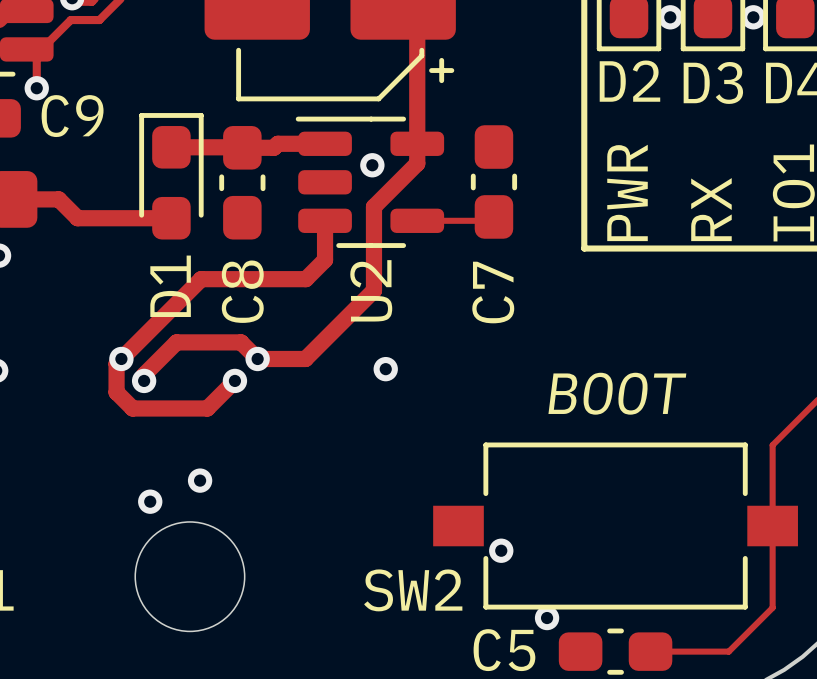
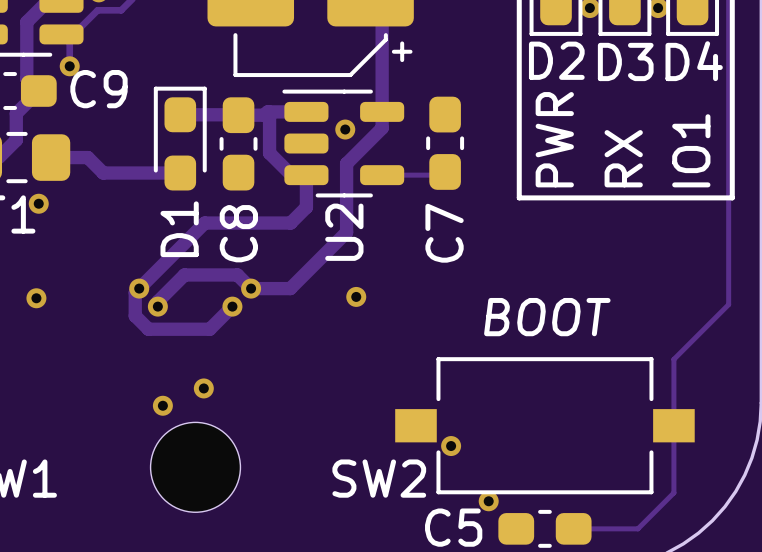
track: none -> (269, 112) (269, 153) (291, 175) (306, 175)

